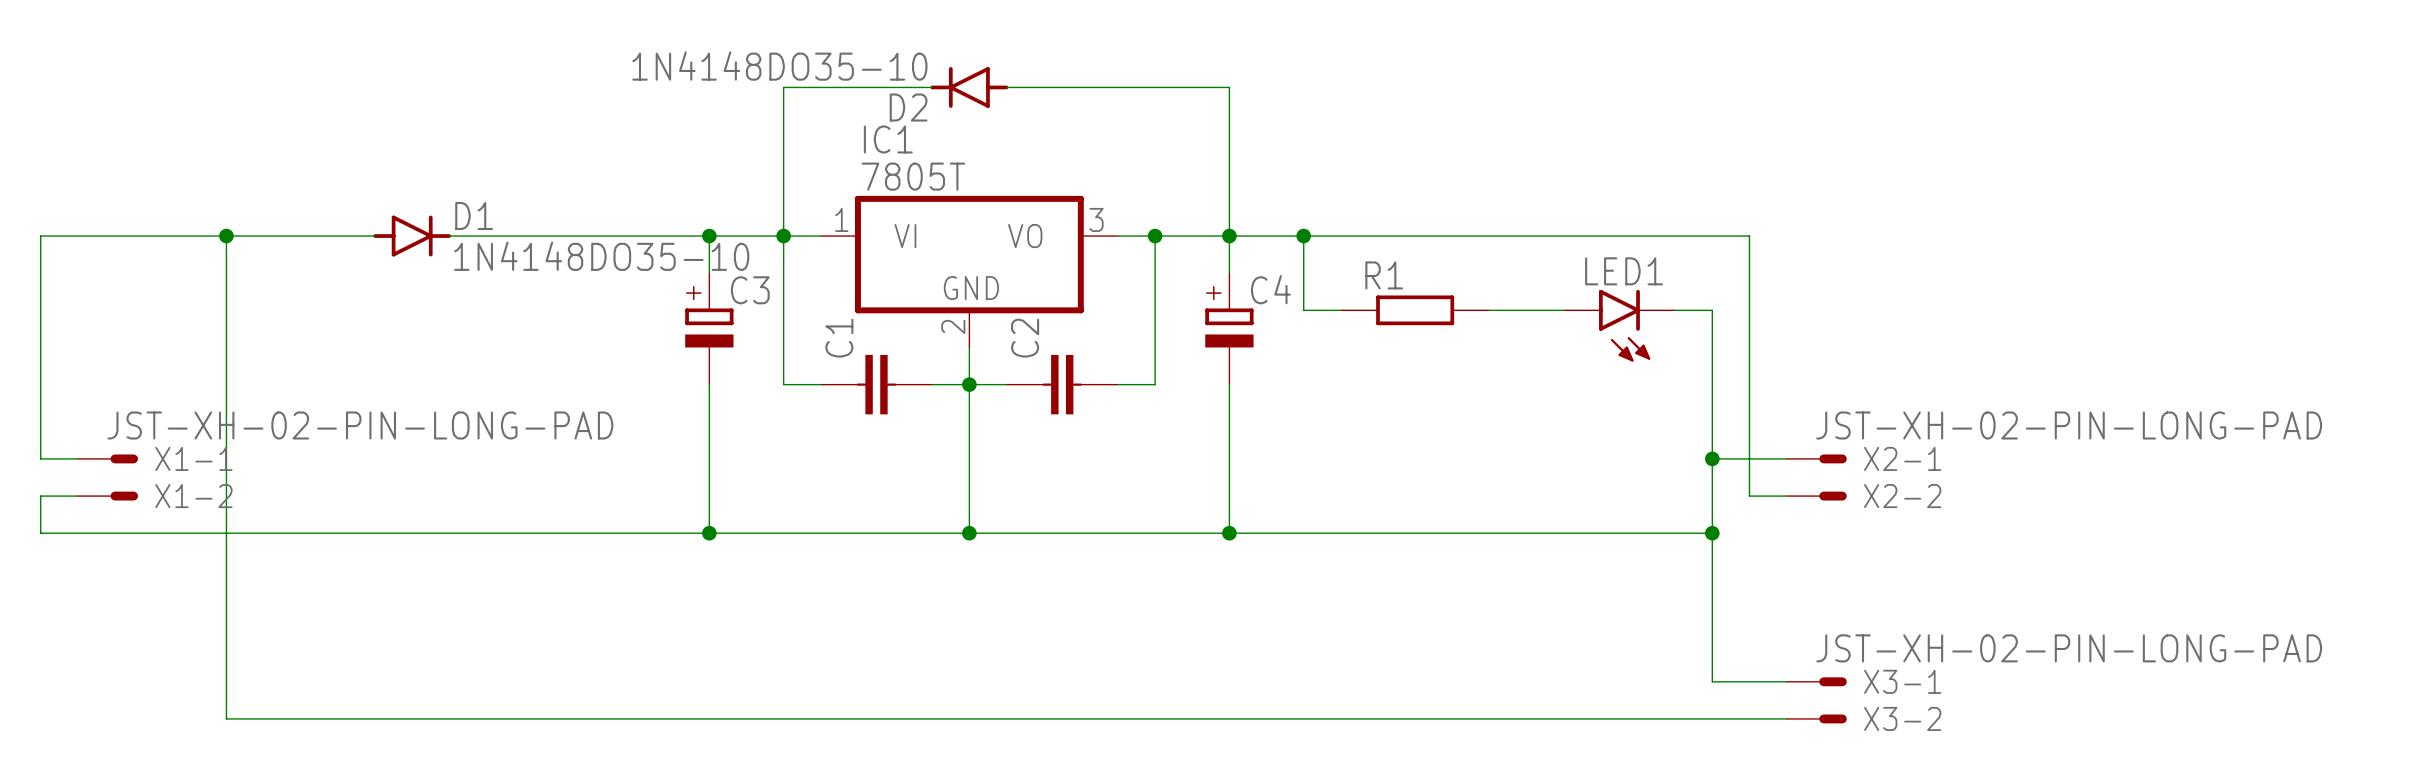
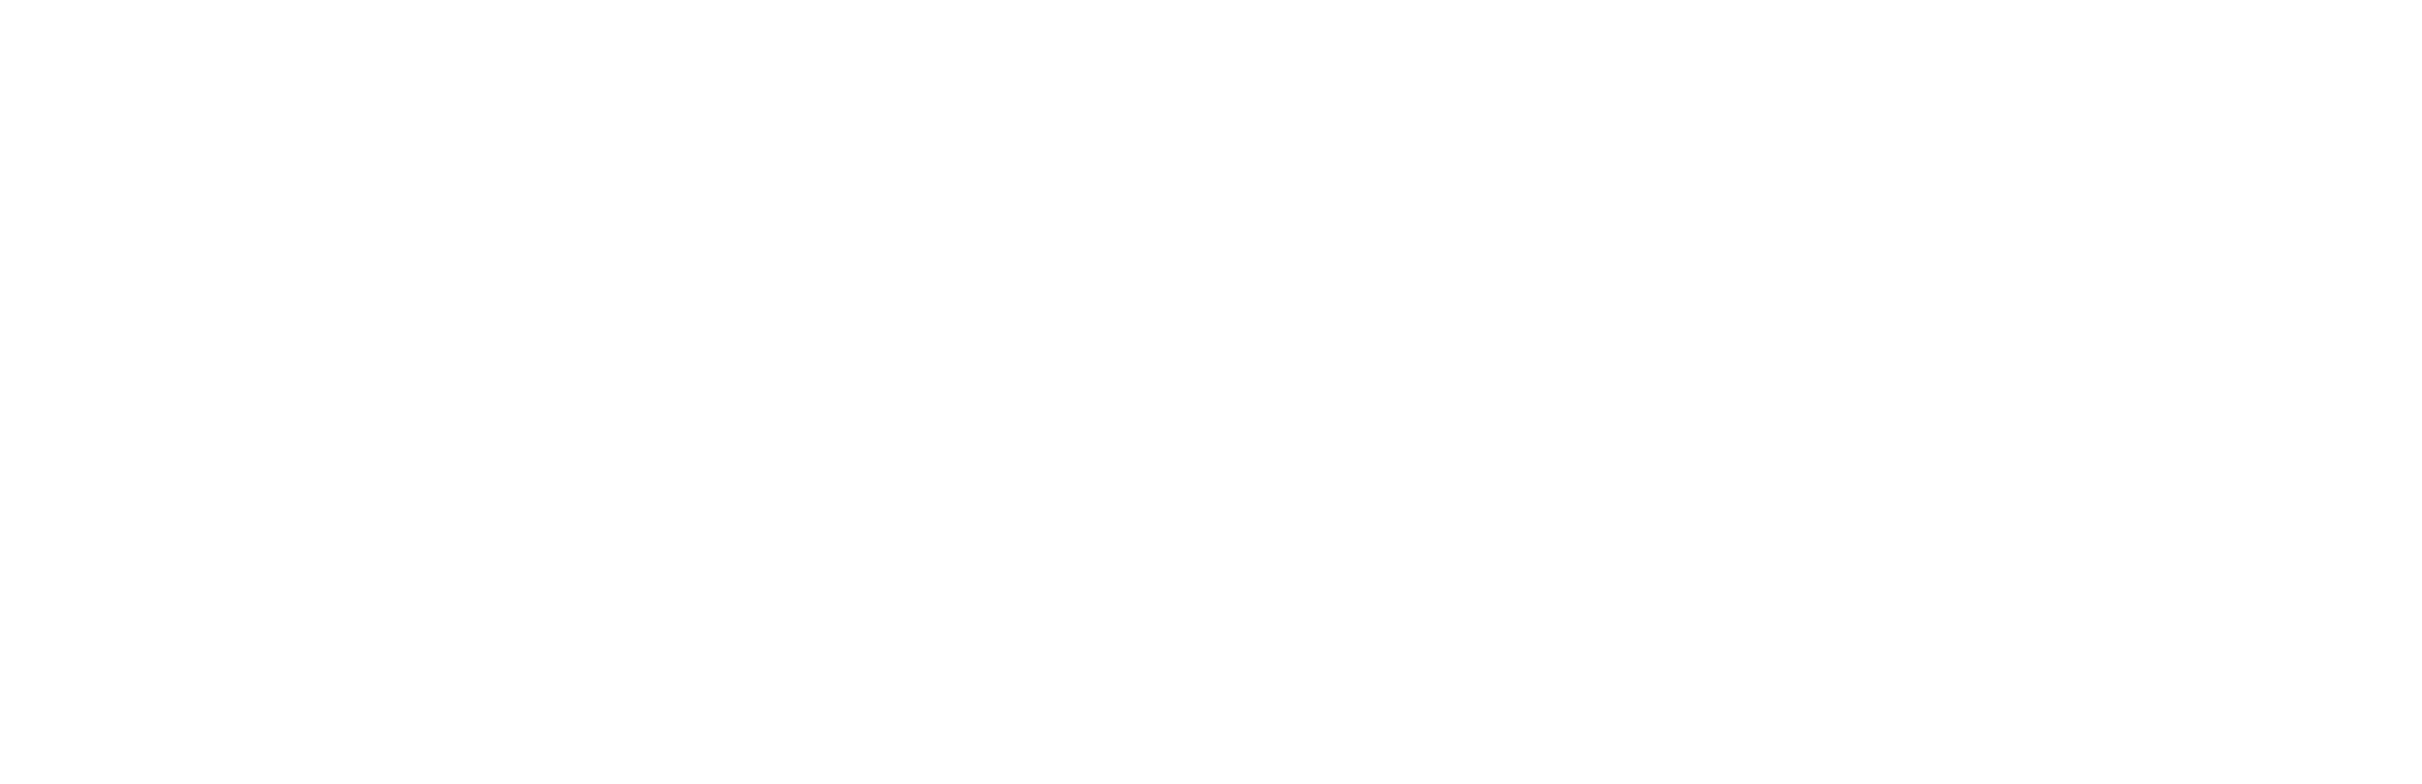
wire: (932, 87) (783, 87) (783, 384) (820, 384) -> none
D2: 1N4148DO35-10 (969, 87) -> none
wire: (1006, 87) (1229, 87) (1229, 273) -> none
wire: (226, 236) (226, 718) (1786, 718) -> none
junction: (226, 236) -> none
wire: (375, 236) (40, 236) (40, 458) (77, 458) -> none
D1: 1N4148DO35-10 (412, 236) -> none
wire: (449, 236) (820, 236) -> none
wire: (709, 236) (709, 273) -> none
junction: (709, 236) -> none
junction: (783, 236) -> none
wire: (1117, 236) (1749, 236) (1749, 496) (1786, 496) -> none
wire: (1155, 236) (1155, 384) (1117, 384) -> none
junction: (1155, 236) -> none
junction: (1229, 236) -> none
wire: (1303, 236) (1303, 310) (1340, 310) -> none
junction: (1303, 236) -> none
IC1: 7805T (969, 271) -> none
R1: (1415, 310) -> none
wire: (1489, 310) (1563, 310) -> none
wire: (1675, 310) (1712, 310) (1712, 681) (1786, 681) -> none
LED1: (1619, 325) -> none
C3: (709, 328) -> none
C4: (1229, 328) -> none
wire: (969, 347) (969, 533) -> none
wire: (709, 384) (709, 533) -> none
C1: (876, 384) -> none
wire: (932, 384) (1006, 384) -> none
junction: (969, 384) -> none
C2: (1062, 384) -> none
wire: (1229, 384) (1229, 533) -> none
X1-1: JST-XH-02-PIN-LONG-PAD (107, 458) -> none
wire: (1712, 458) (1786, 458) -> none
junction: (1712, 458) -> none
X2-1: JST-XH-02-PIN-LONG-PAD (1816, 458) -> none
wire: (77, 496) (40, 496) (40, 533) (1712, 533) -> none
X1-2: (107, 496) -> none
X2-2: (1816, 496) -> none
junction: (709, 533) -> none
junction: (969, 533) -> none
junction: (1229, 533) -> none
junction: (1712, 533) -> none
X3-1: JST-XH-02-PIN-LONG-PAD (1816, 681) -> none
X3-2: (1816, 718) -> none

